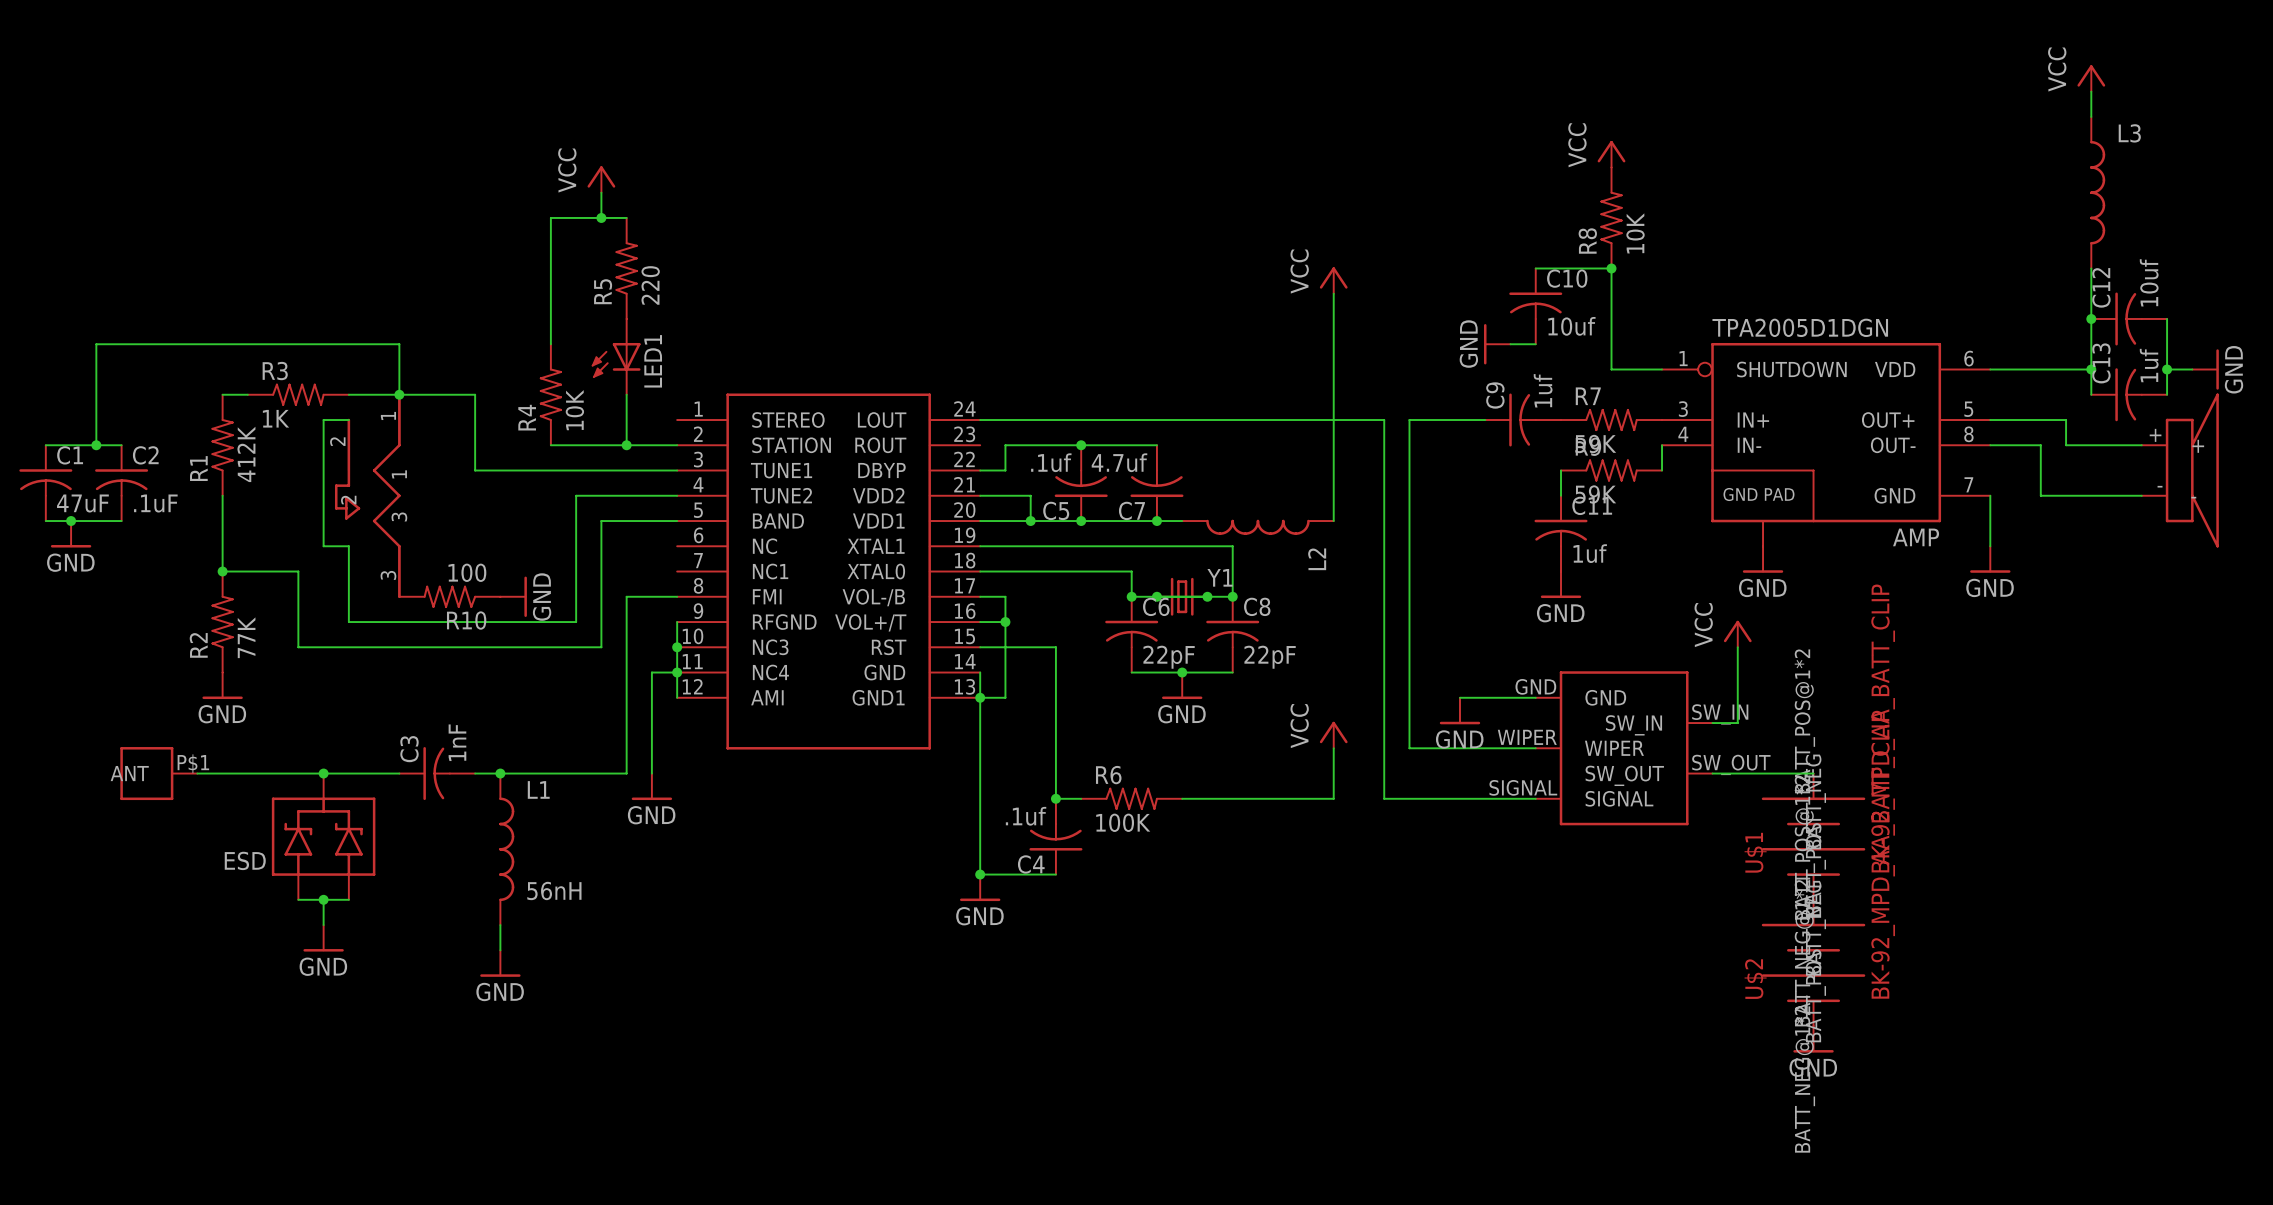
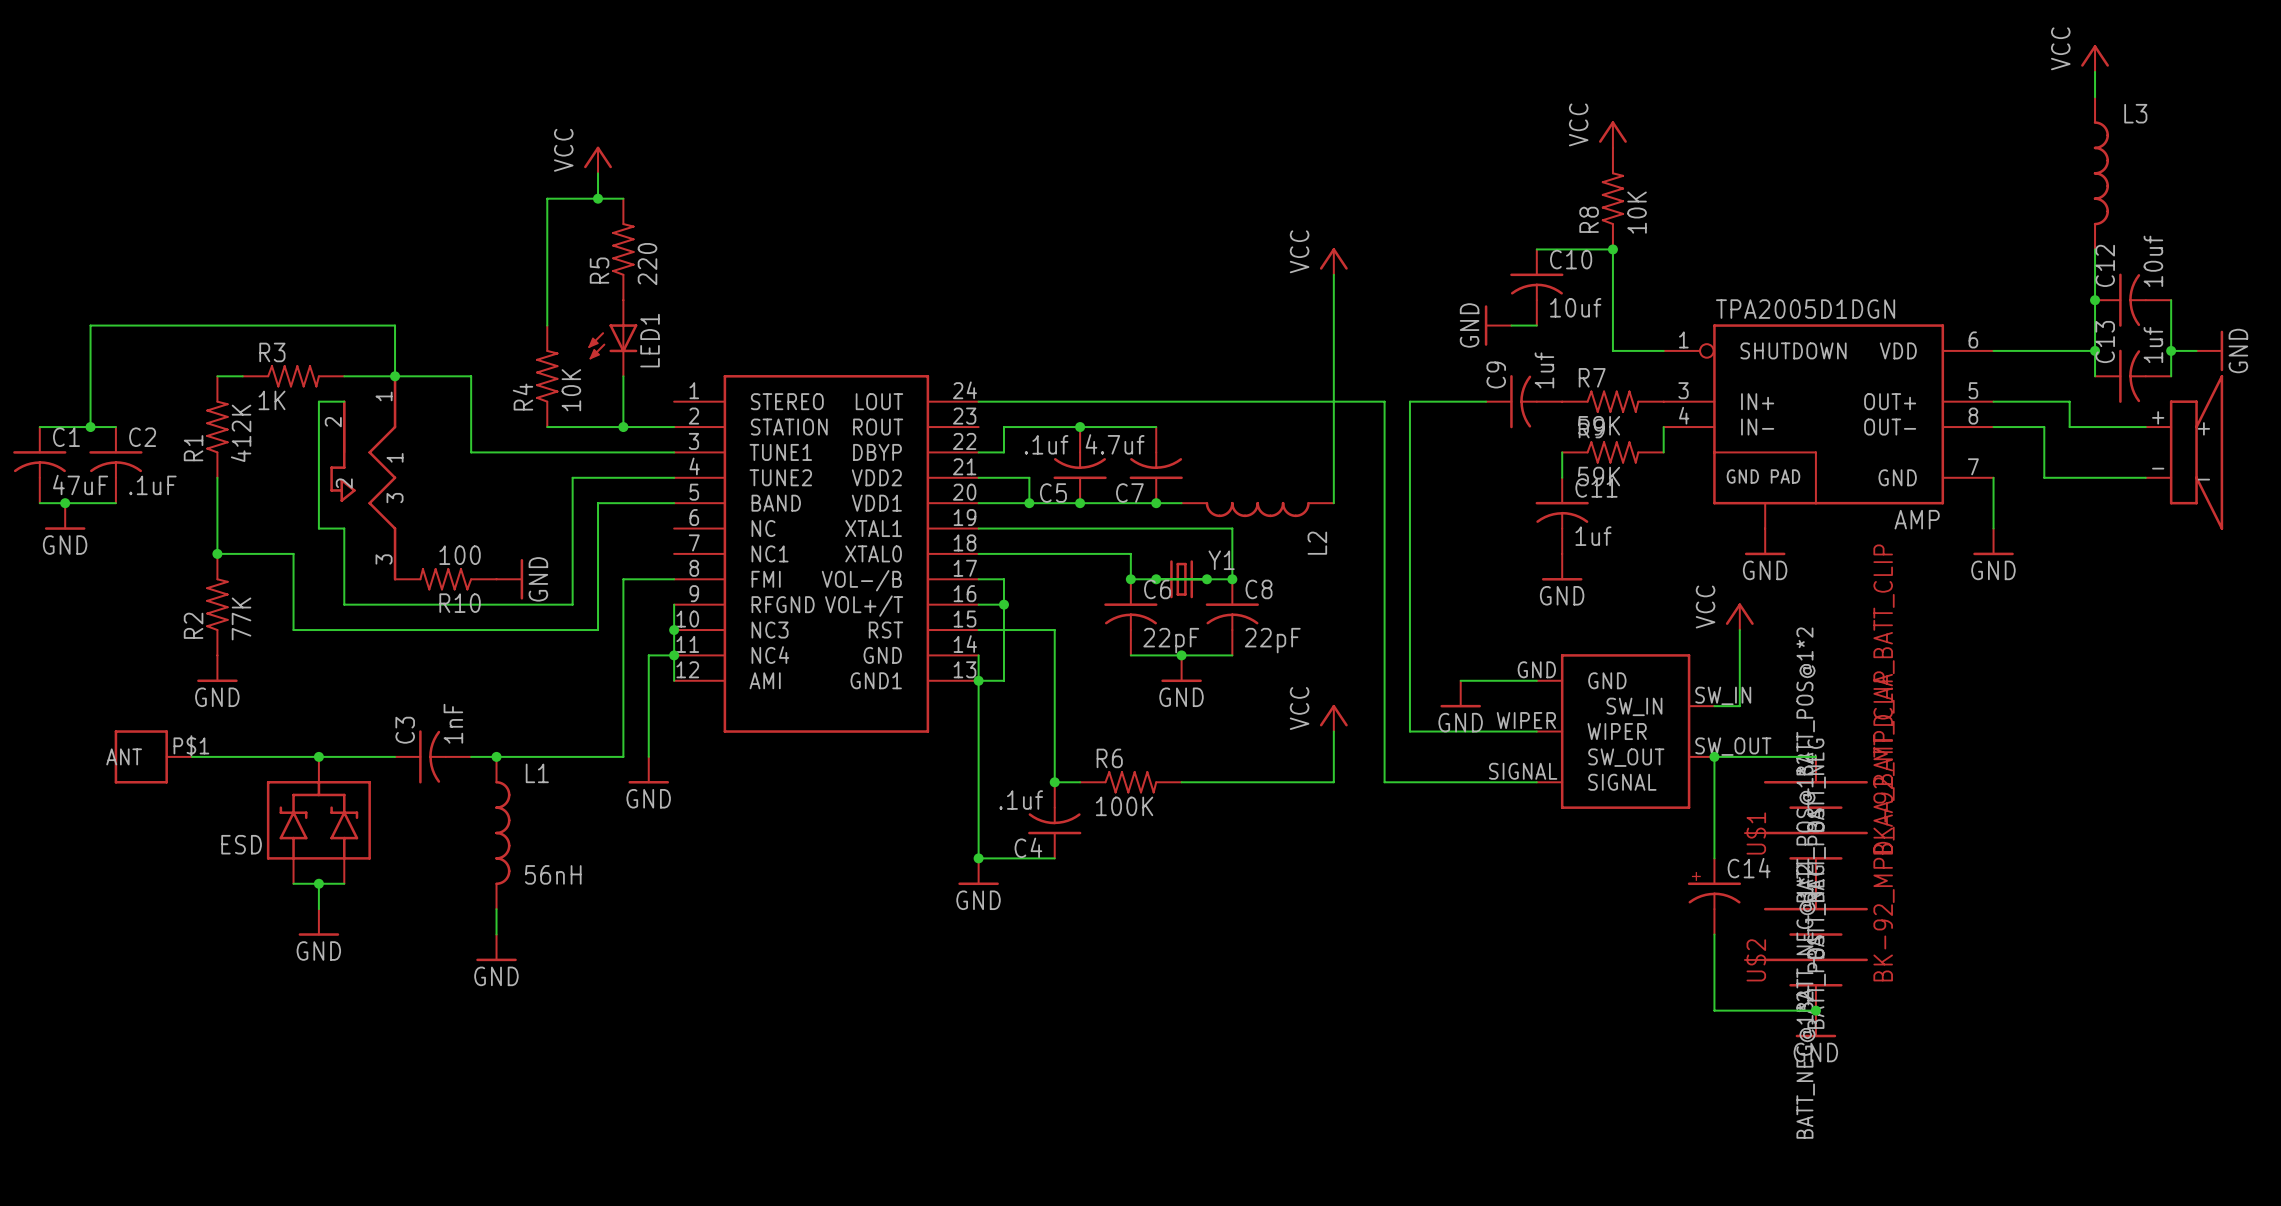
wire: none -> (1714, 756) (1714, 858)
junction: none -> (1714, 756)
C14: none -> (1714, 896)
wire: none -> (1714, 934) (1714, 1010) (1815, 1010)
junction: none -> (1815, 1010)

